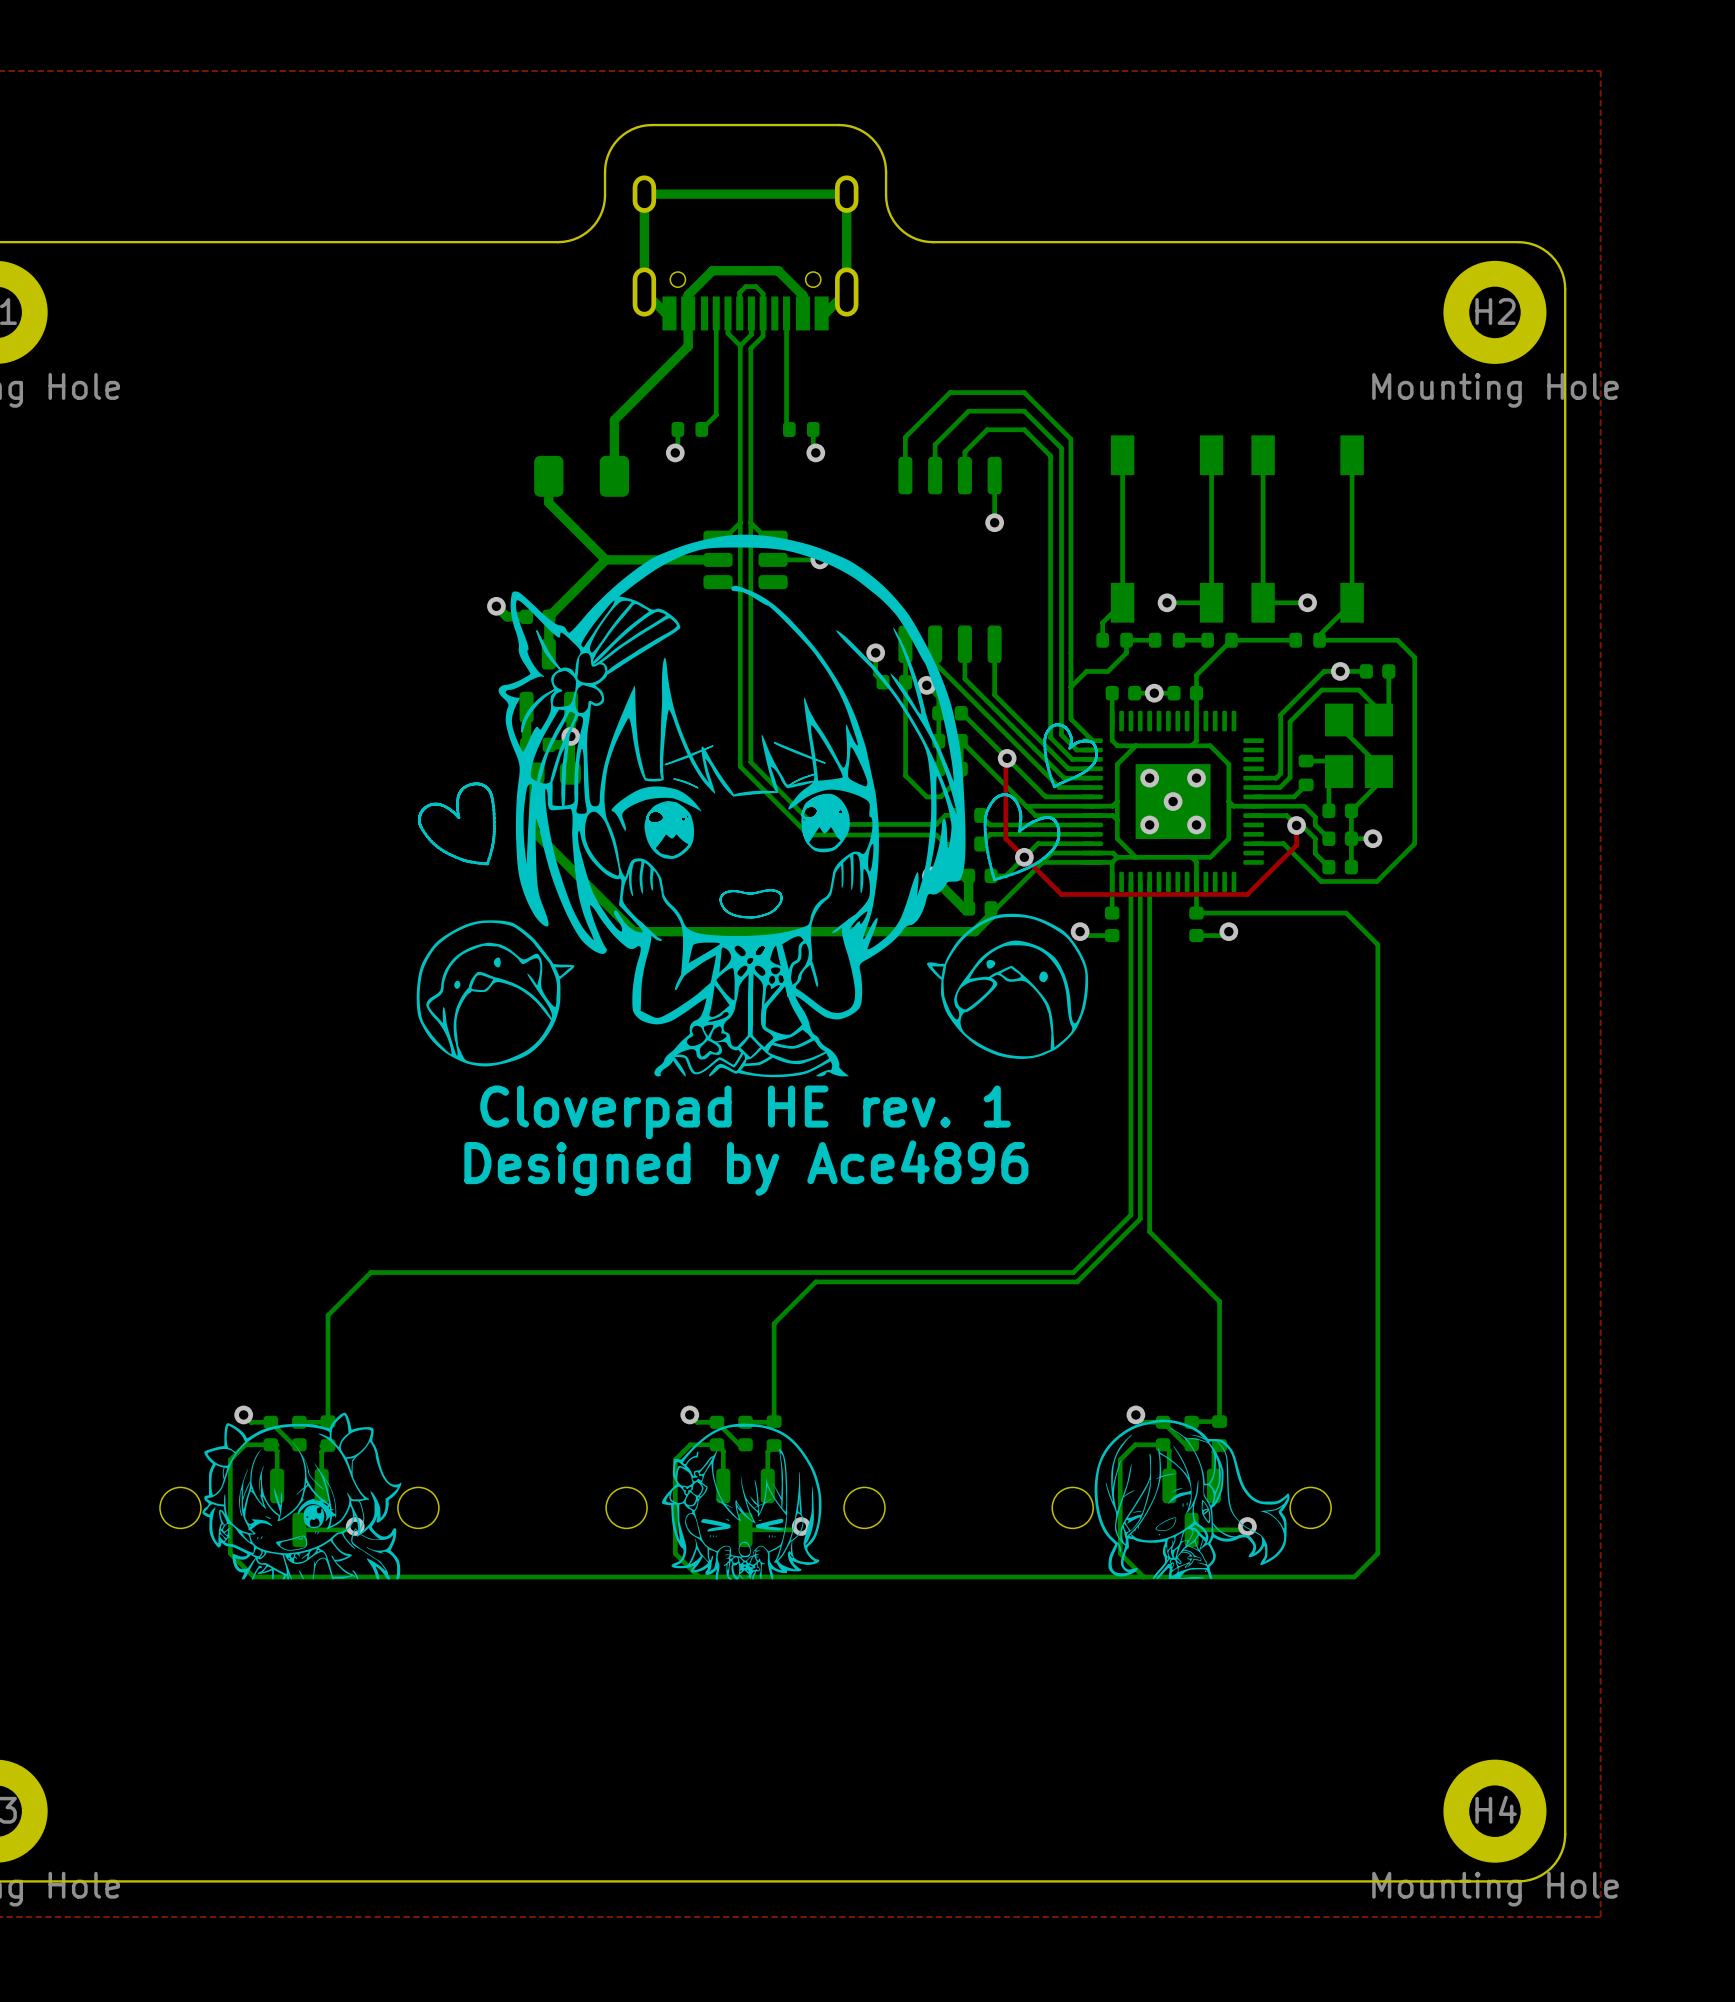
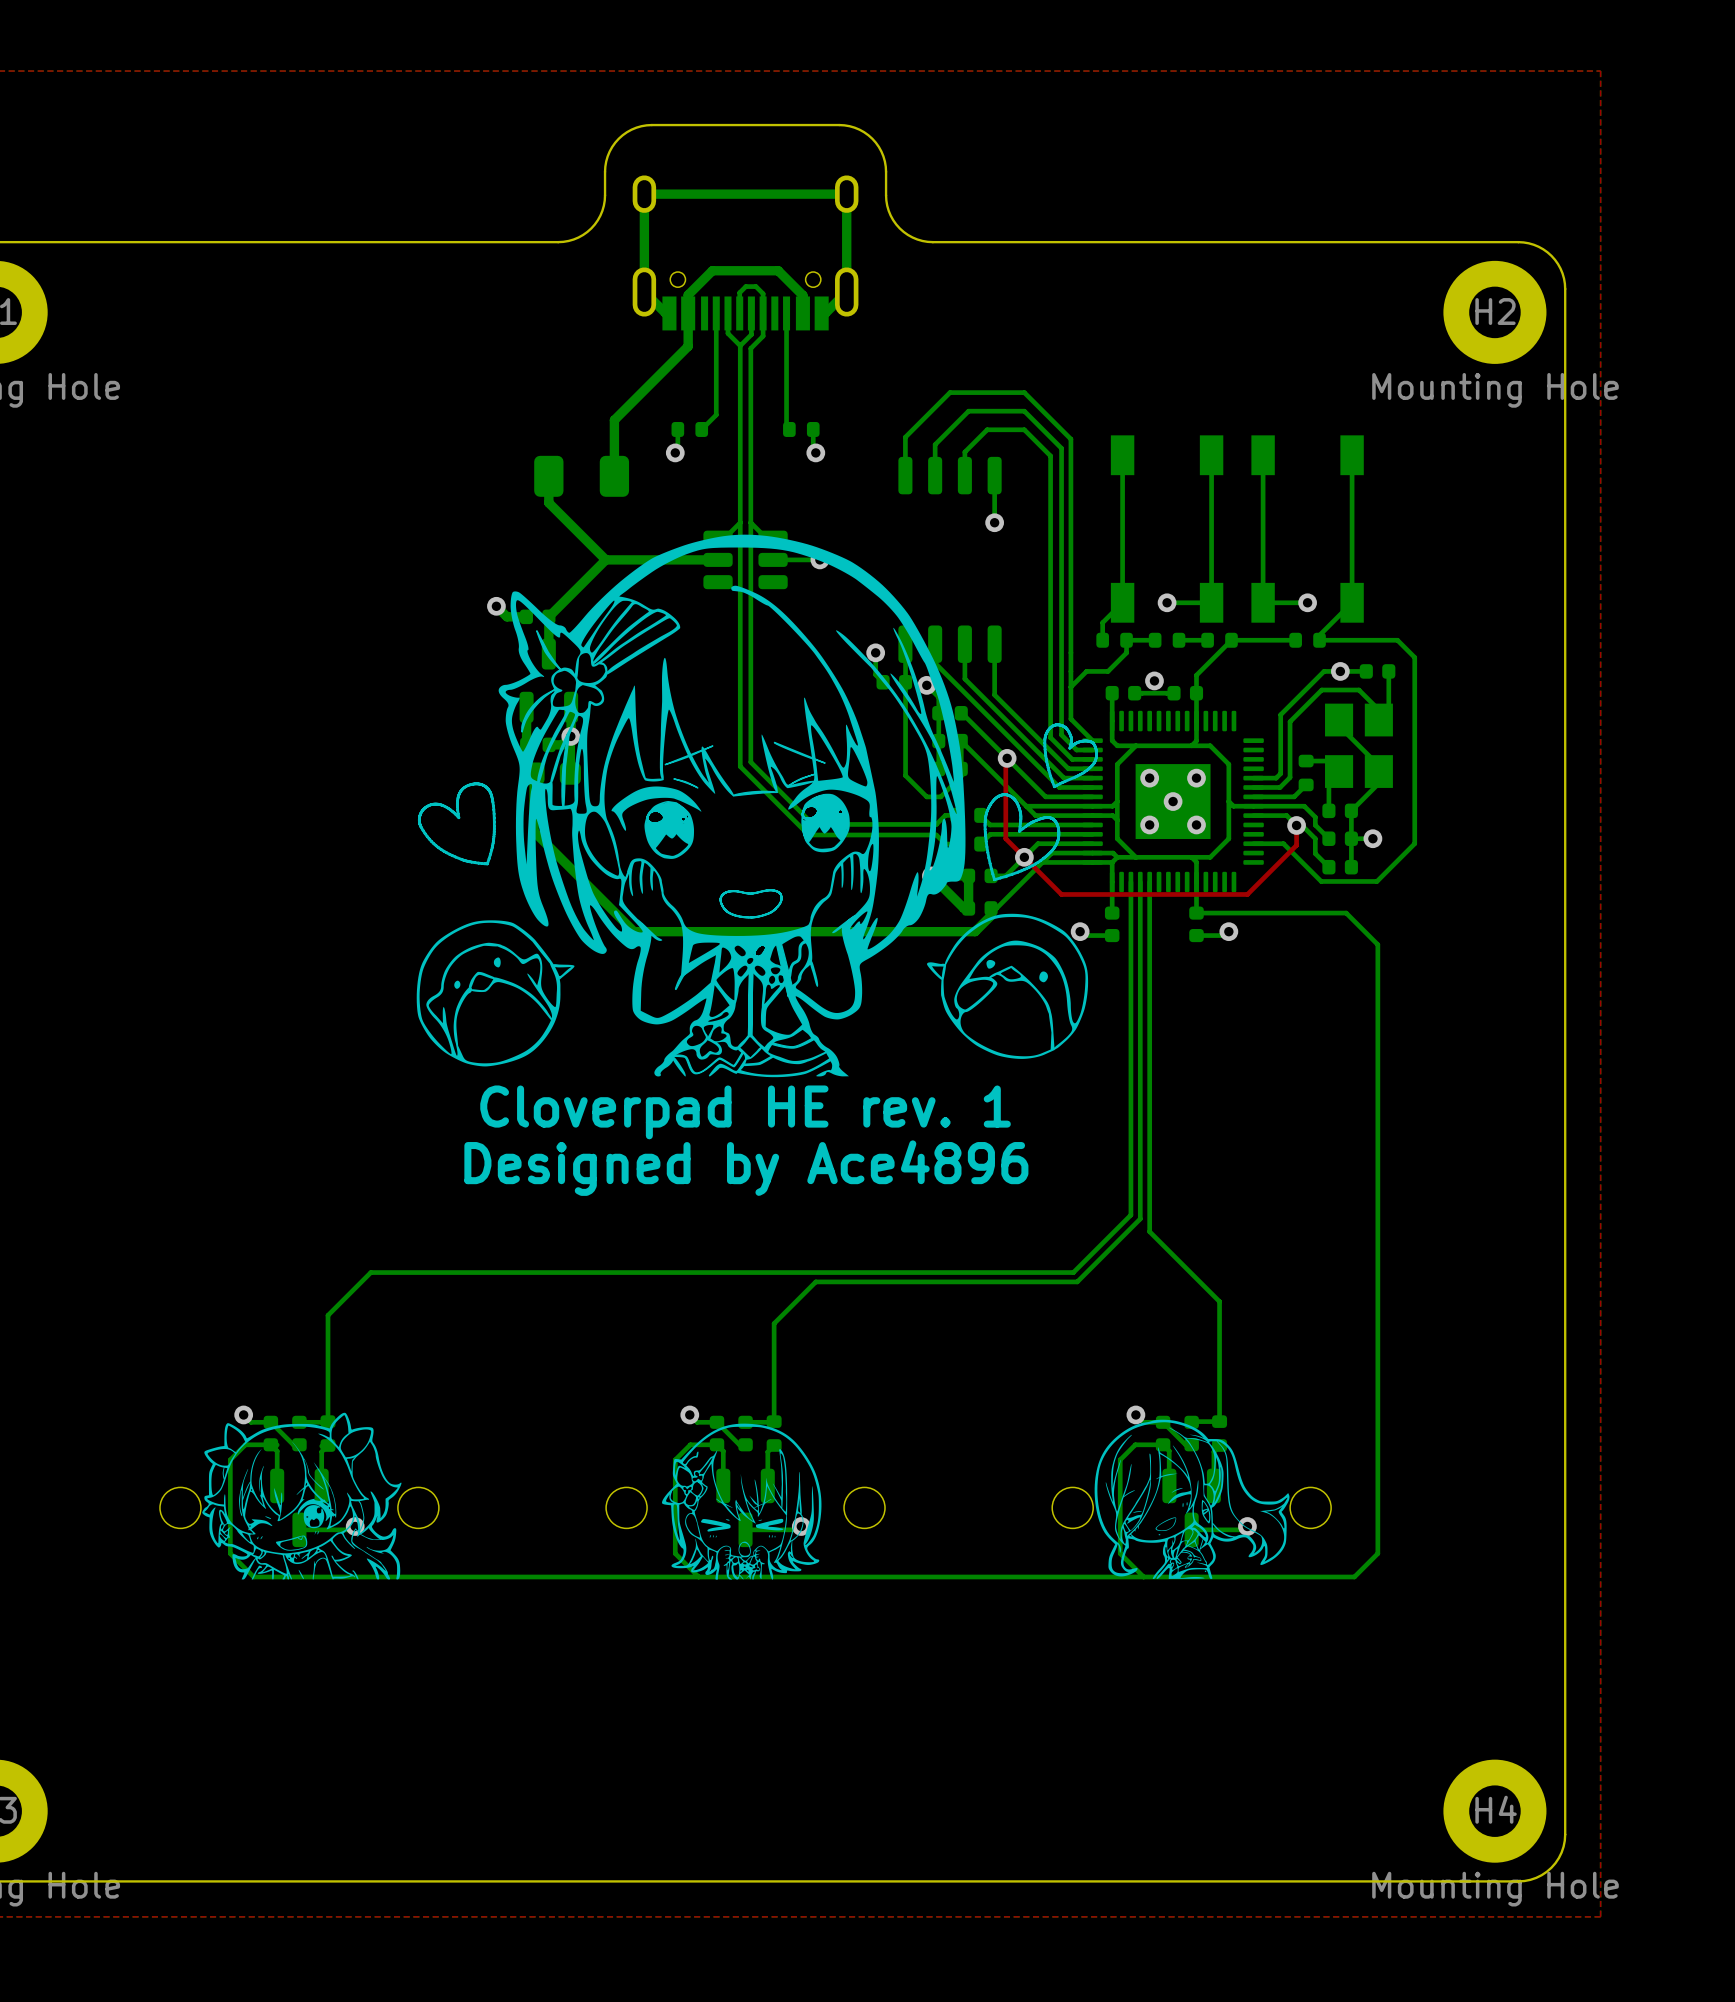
via position: (1154, 693) -> (1154, 680)

